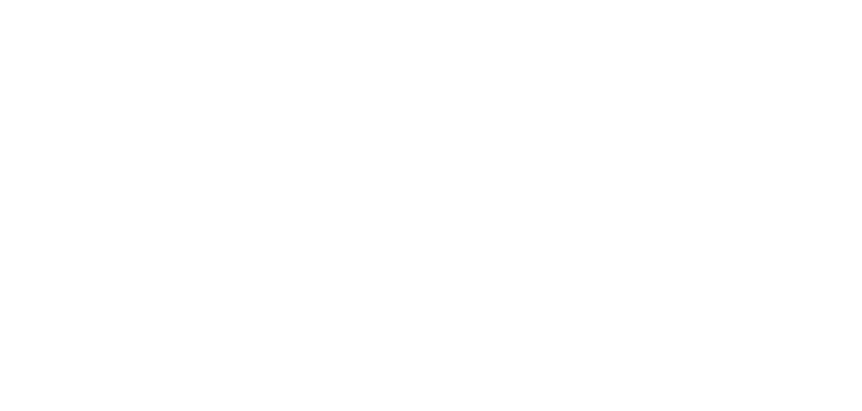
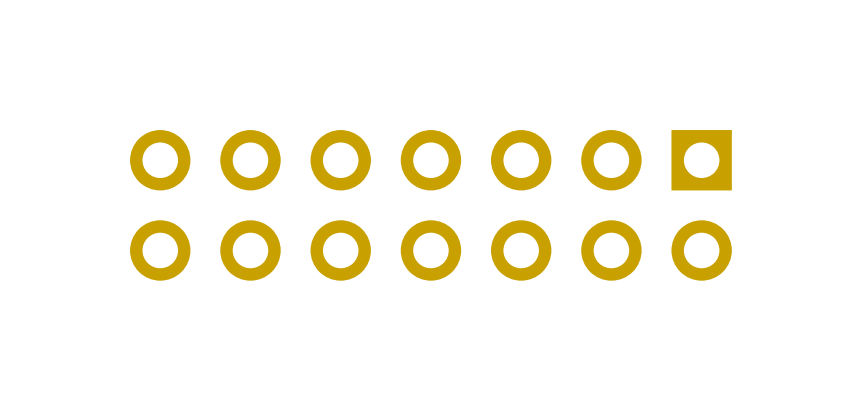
part: none -> (430, 205)

